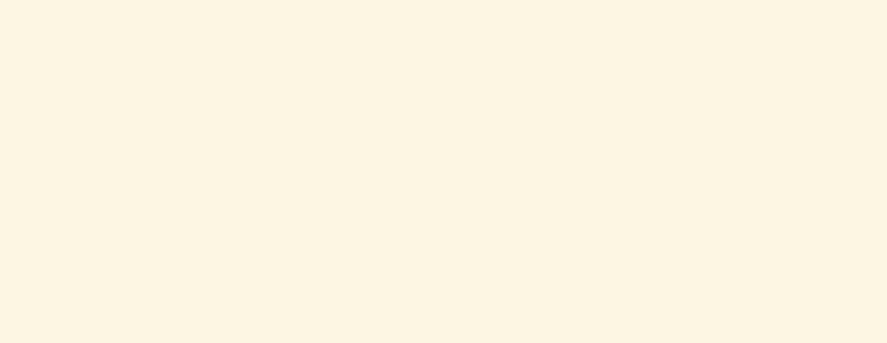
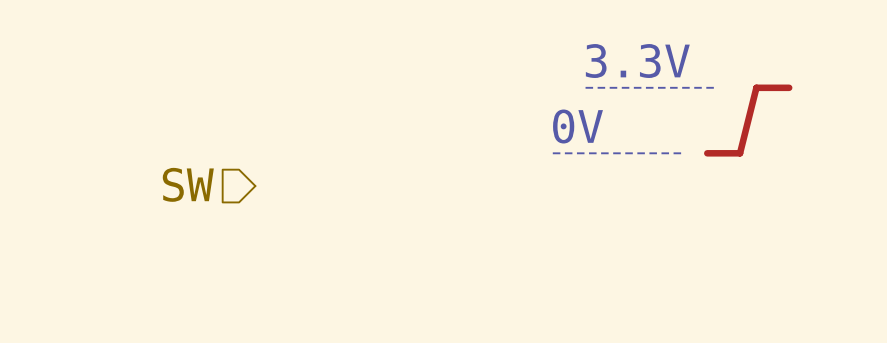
text: none -> 3.3V (637, 61)
line: none -> (582, 87) (713, 87)
power symbol: none -> (748, 120)
text: none -> 0V (578, 126)
line: none -> (550, 153) (681, 153)
hierarchical label: none -> SW (188, 184)

